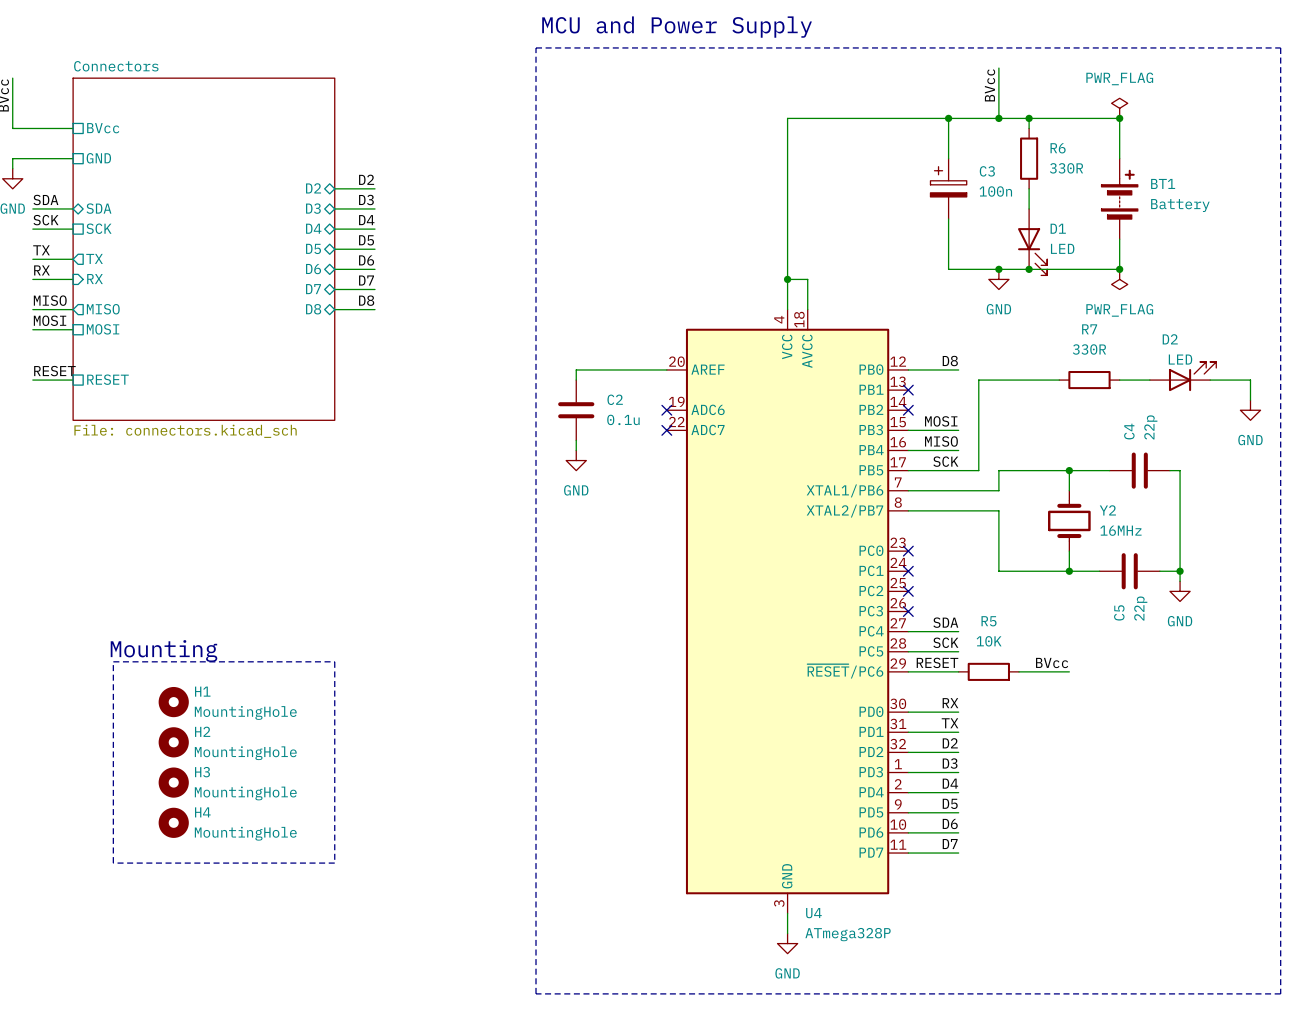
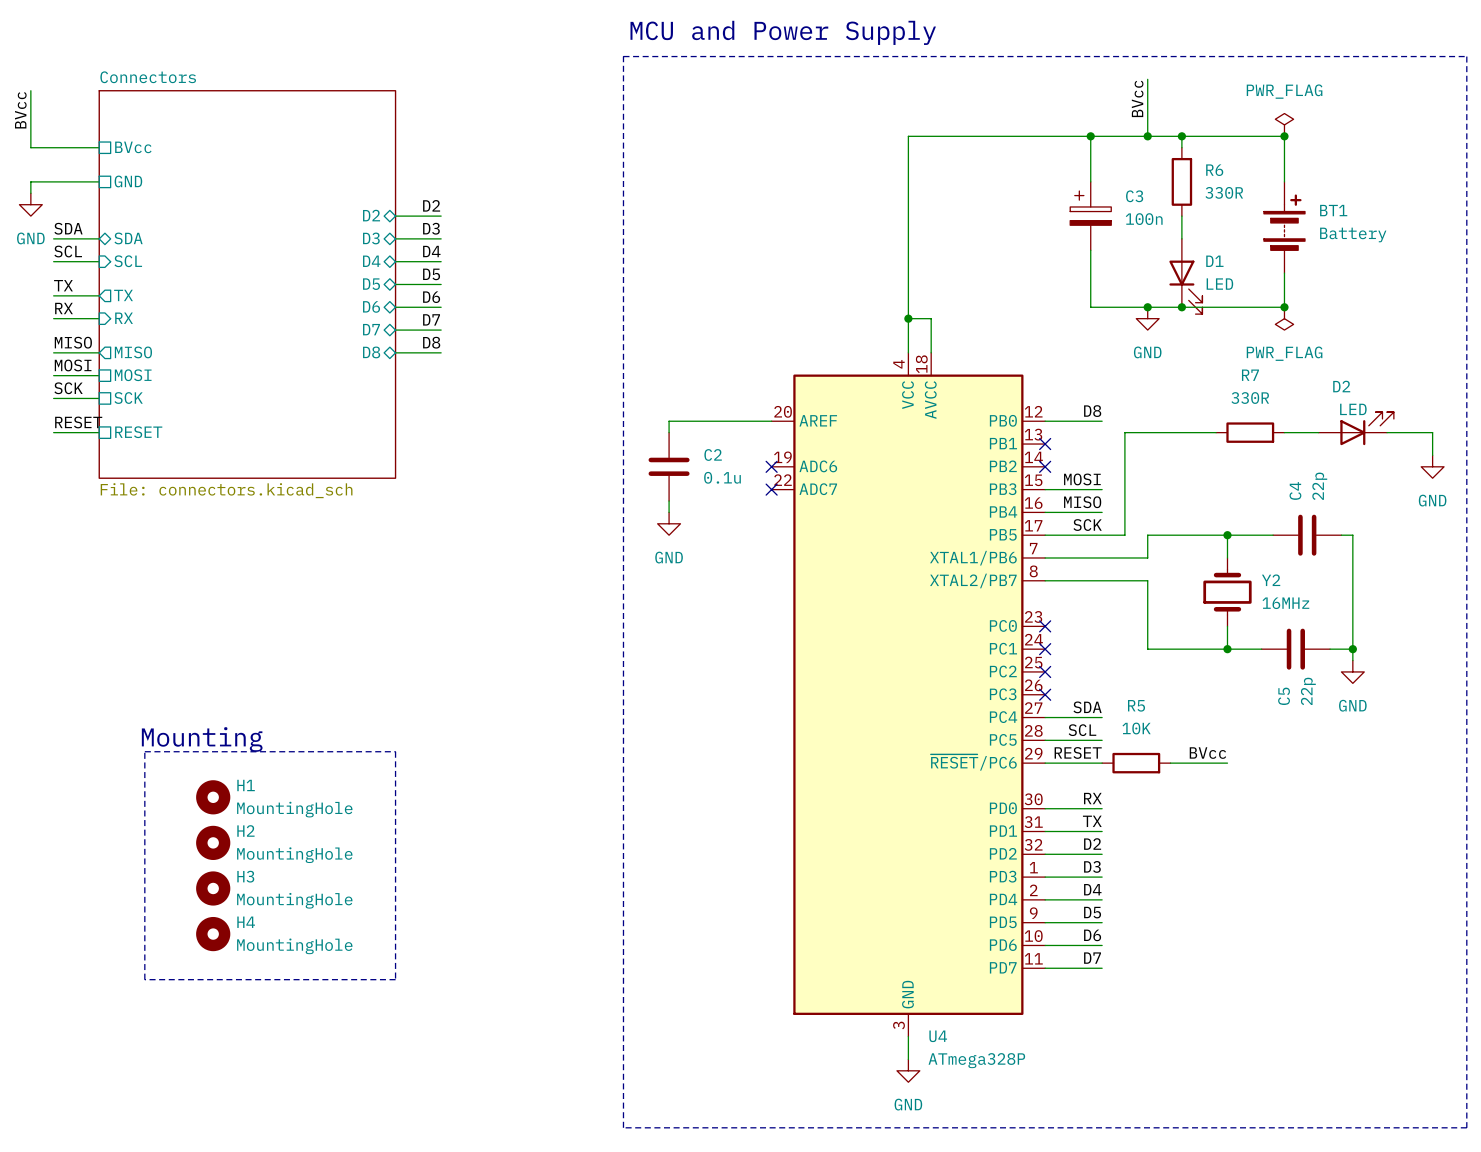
label: SCK (45, 220) -> SCL (68, 251)
sheet pin shape: passive (99, 228) -> input (128, 261)
sheet pin: SCK (99, 228) -> SCL (128, 261)
label: none -> SCK (68, 388)
wire: none -> (53, 398) (99, 398)
sheet pin: none -> SCK (128, 398)
label: SCK (945, 642) -> SCL (1082, 730)

